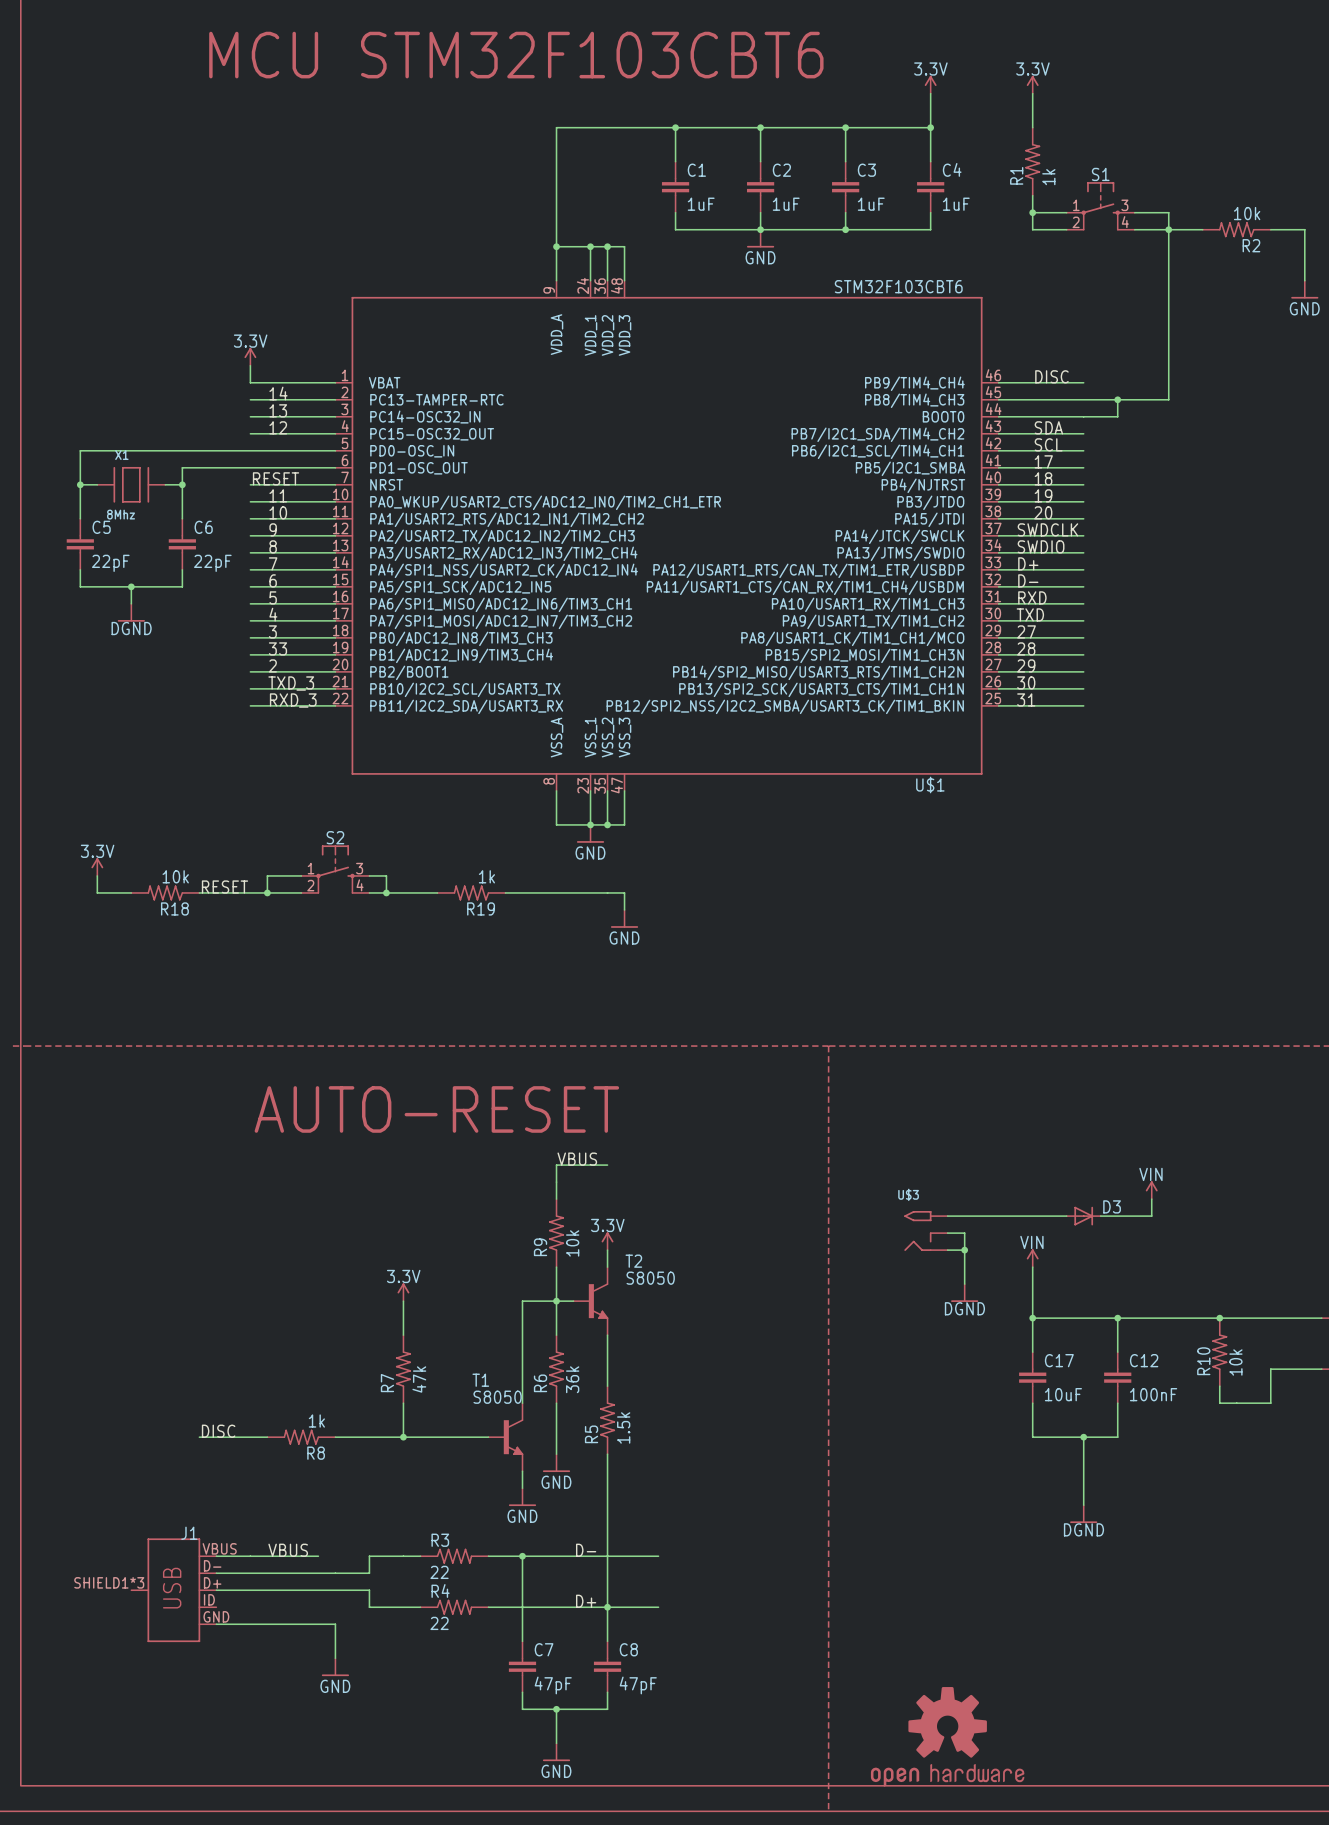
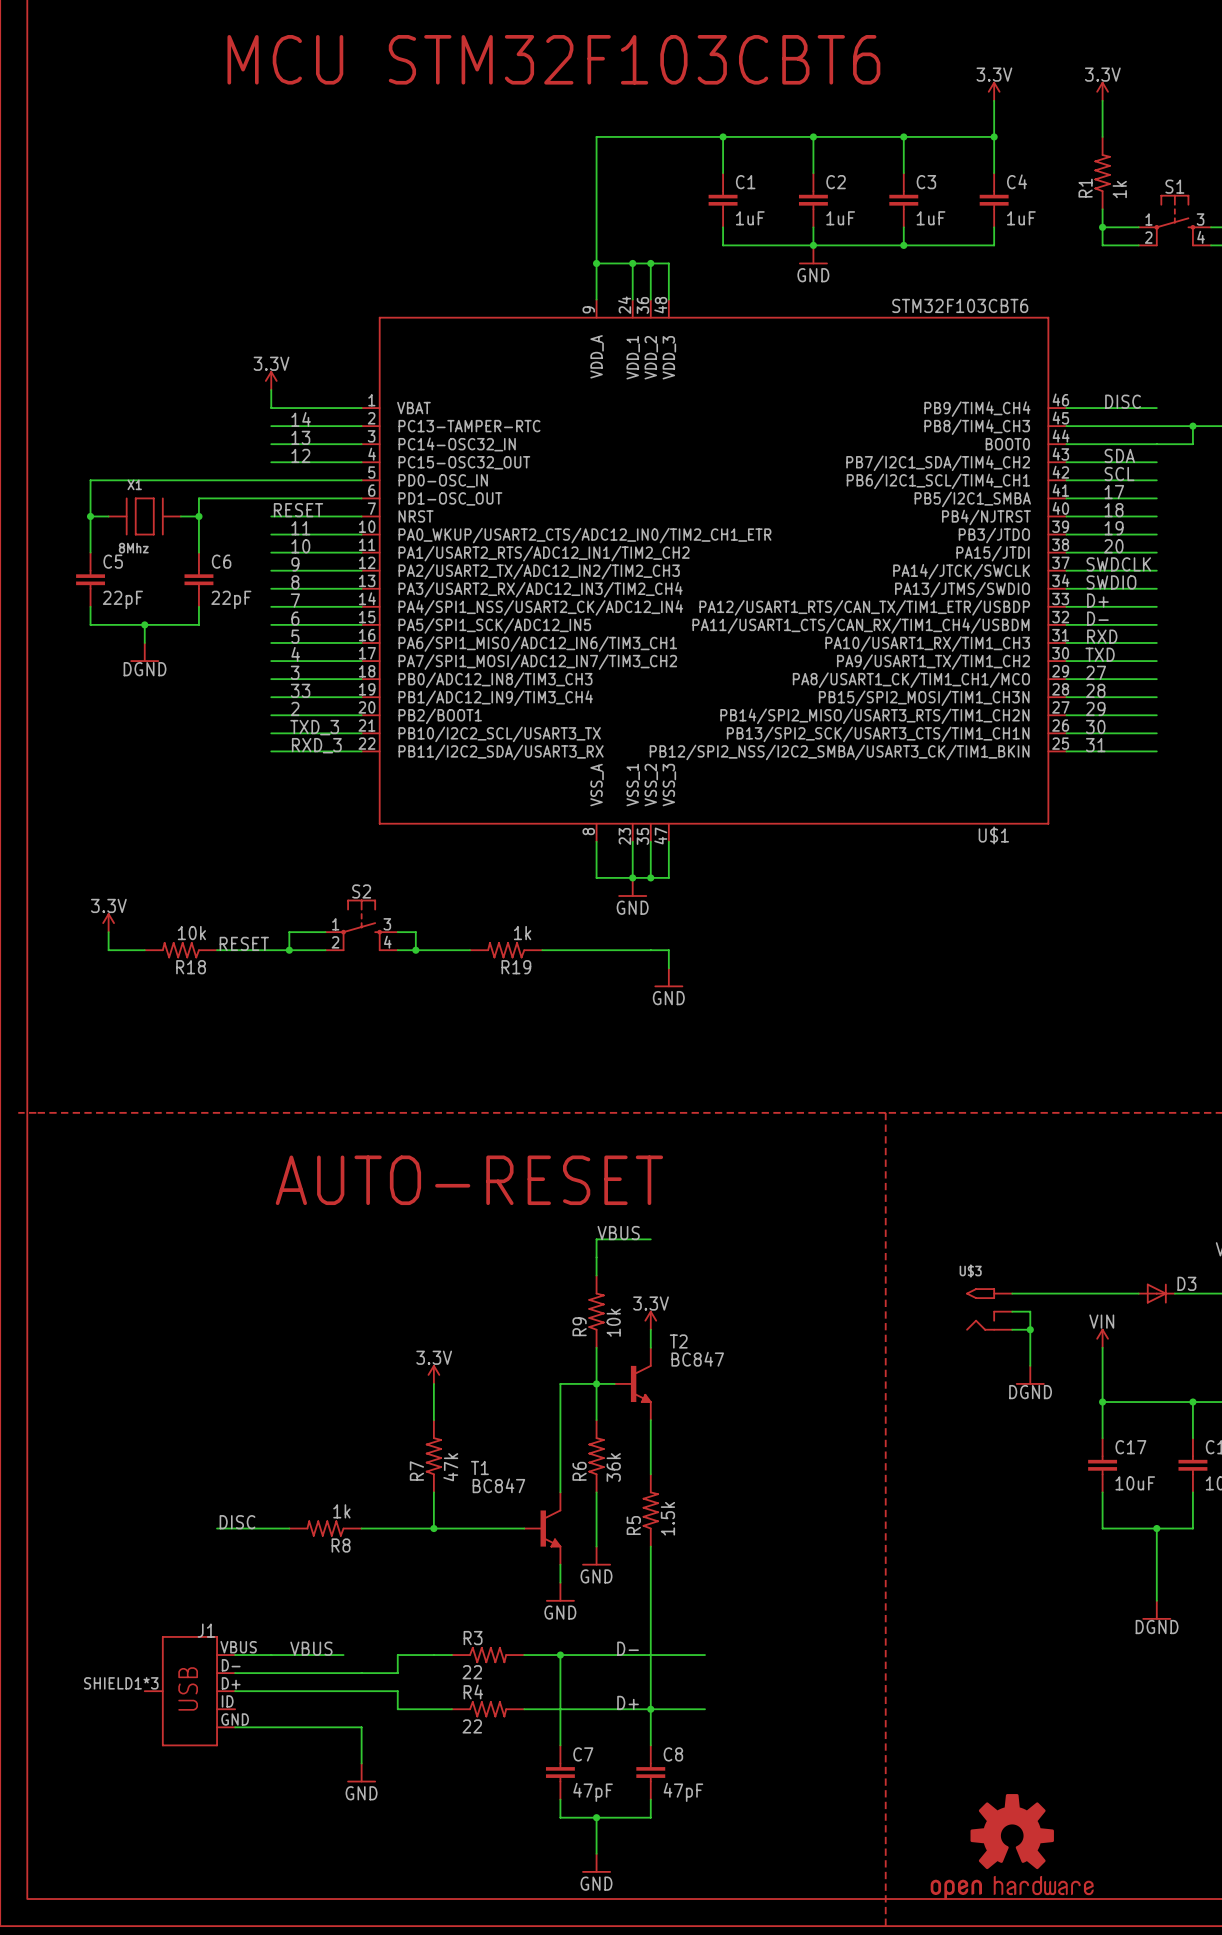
T2 value: S8050 (650, 1278) -> BC847 (697, 1359)
T1 name position: T1 (480, 1380) -> T1 (479, 1467)
T1 value: S8050 (497, 1397) -> BC847 (498, 1485)

